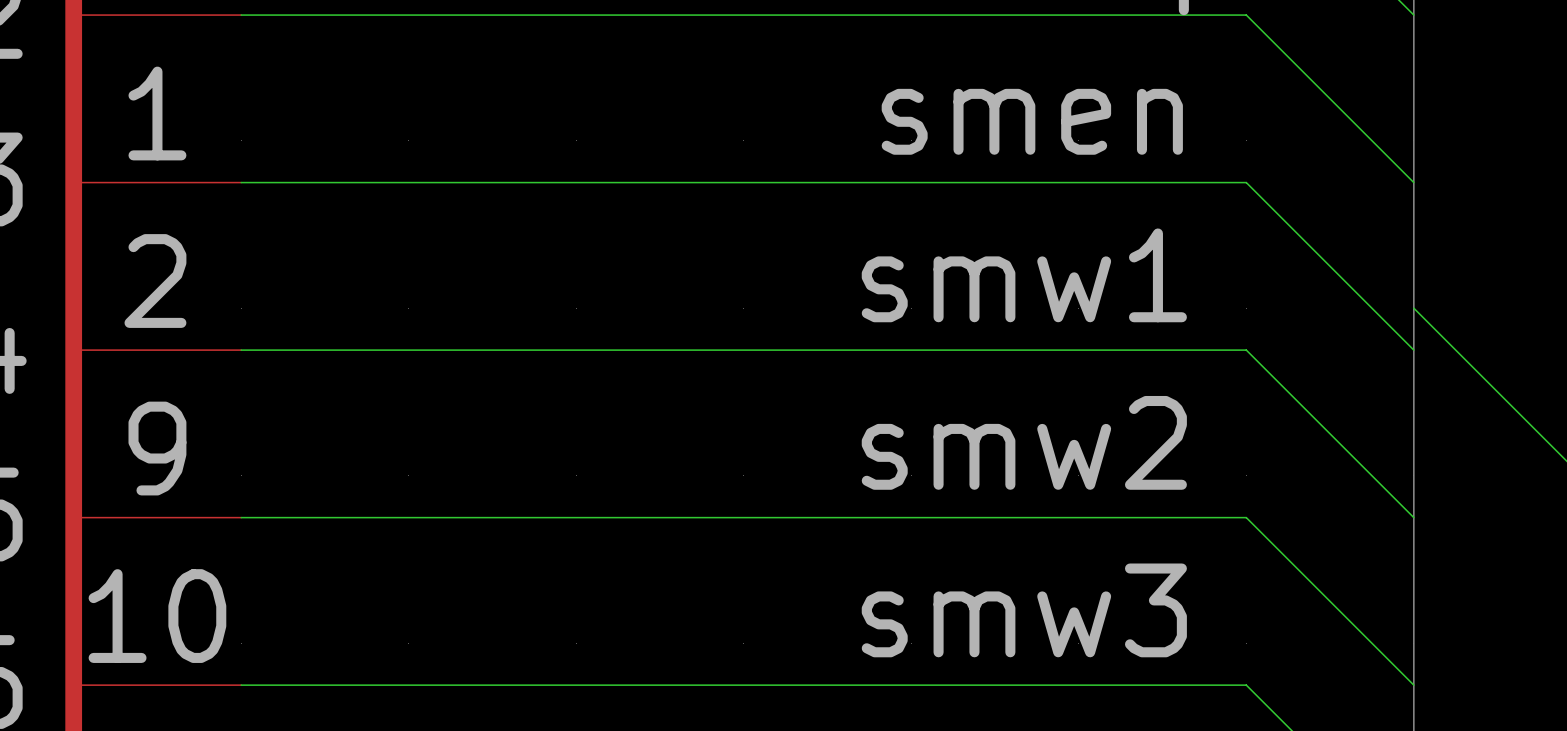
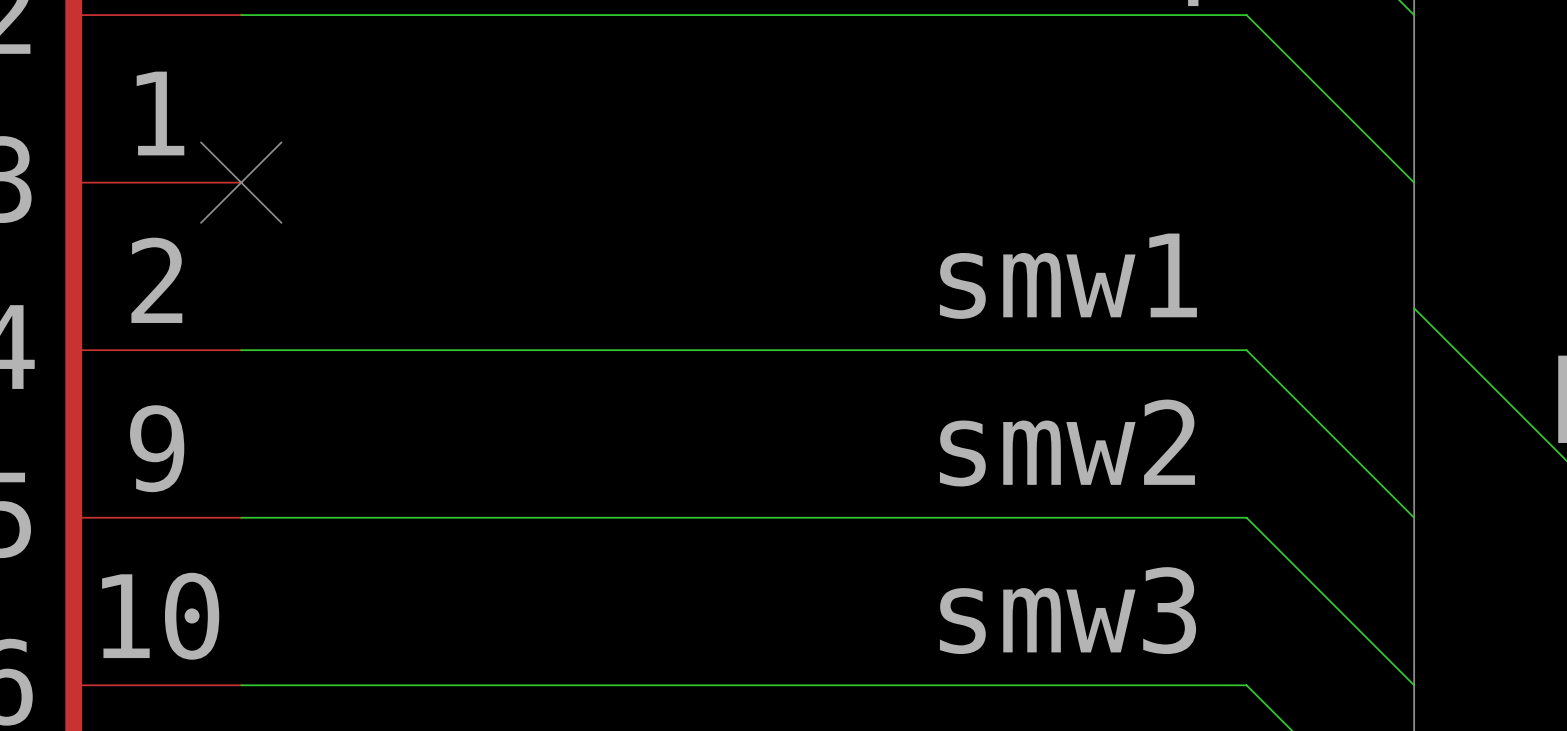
label: smen (1032, 121) -> none
wire: (241, 182) (1246, 182) (1413, 350) -> none
no-connect mark: none -> (241, 182)

